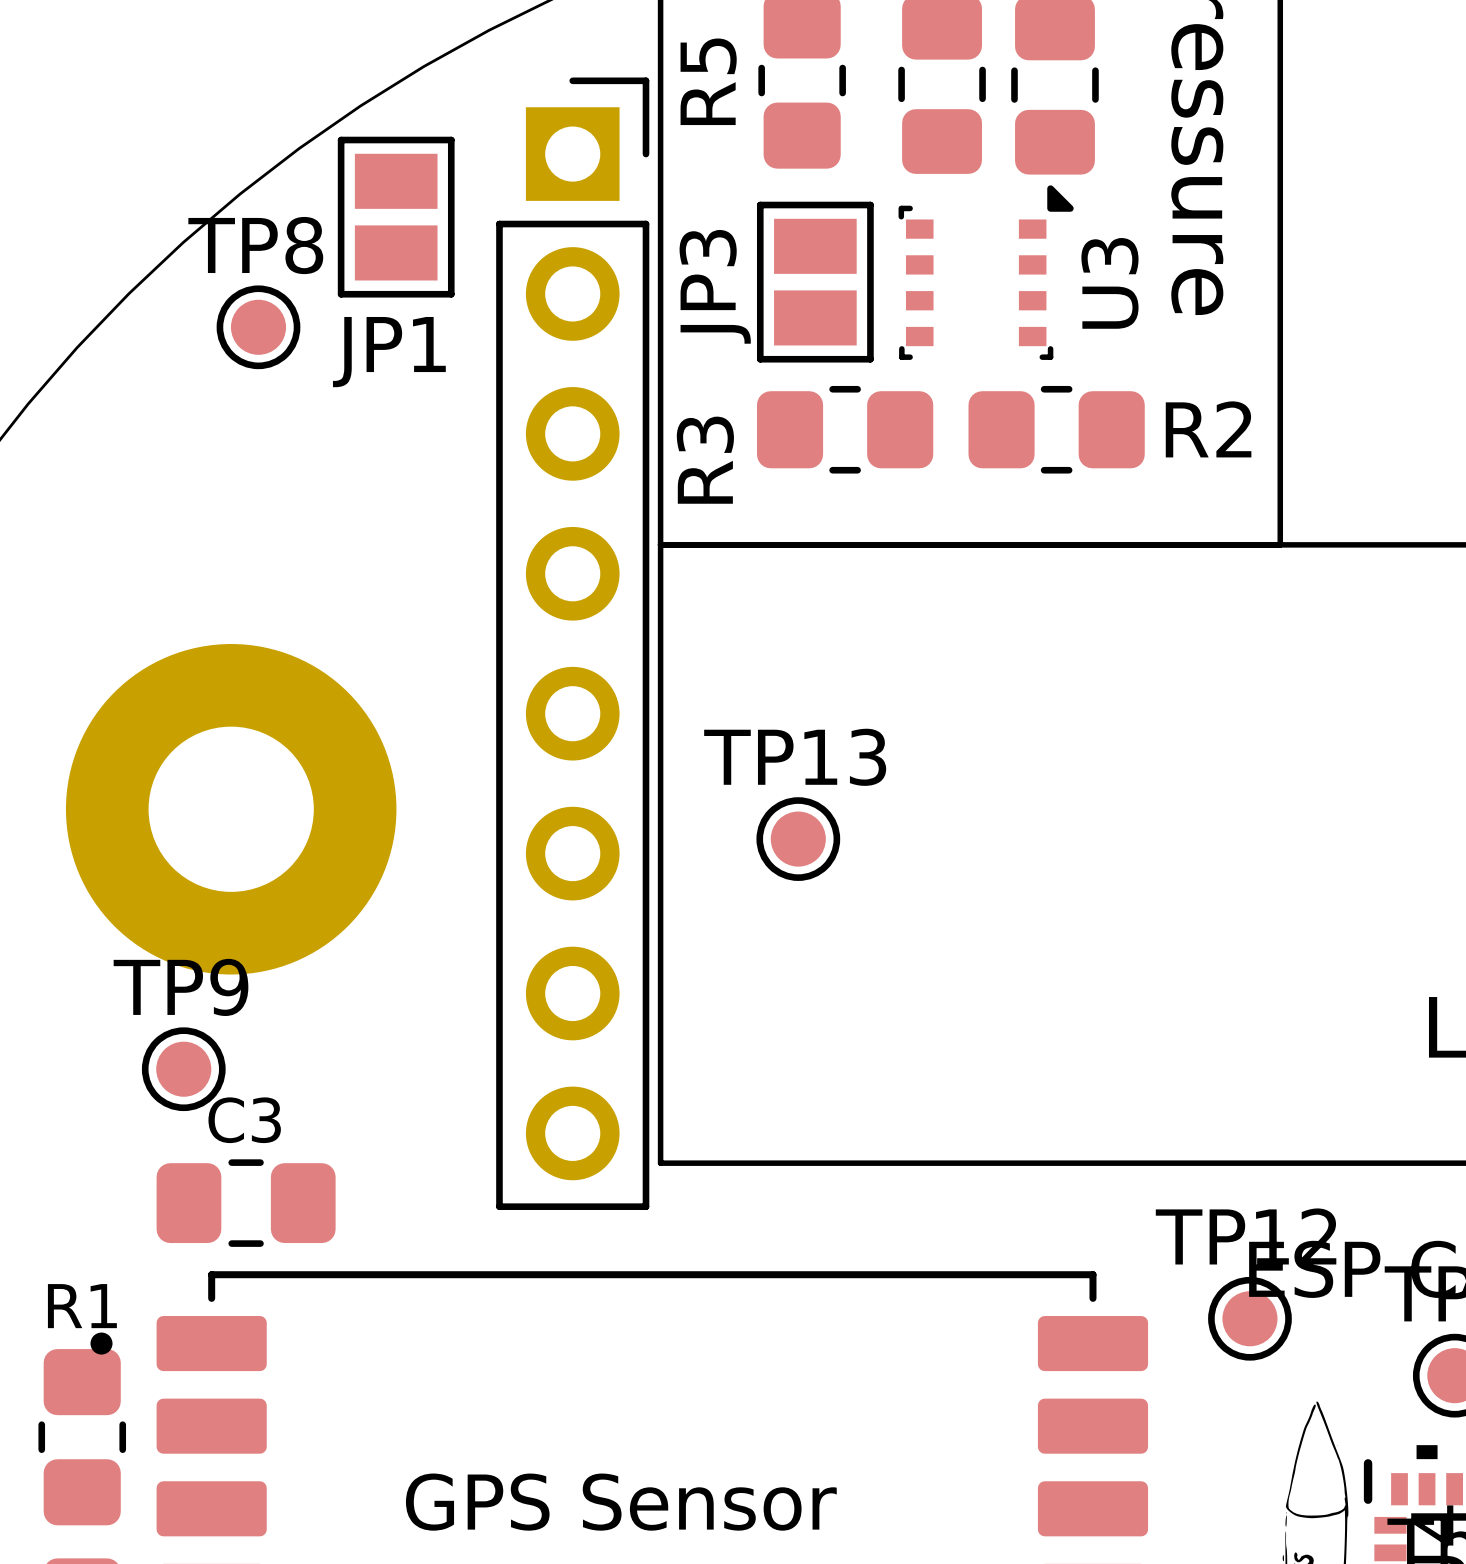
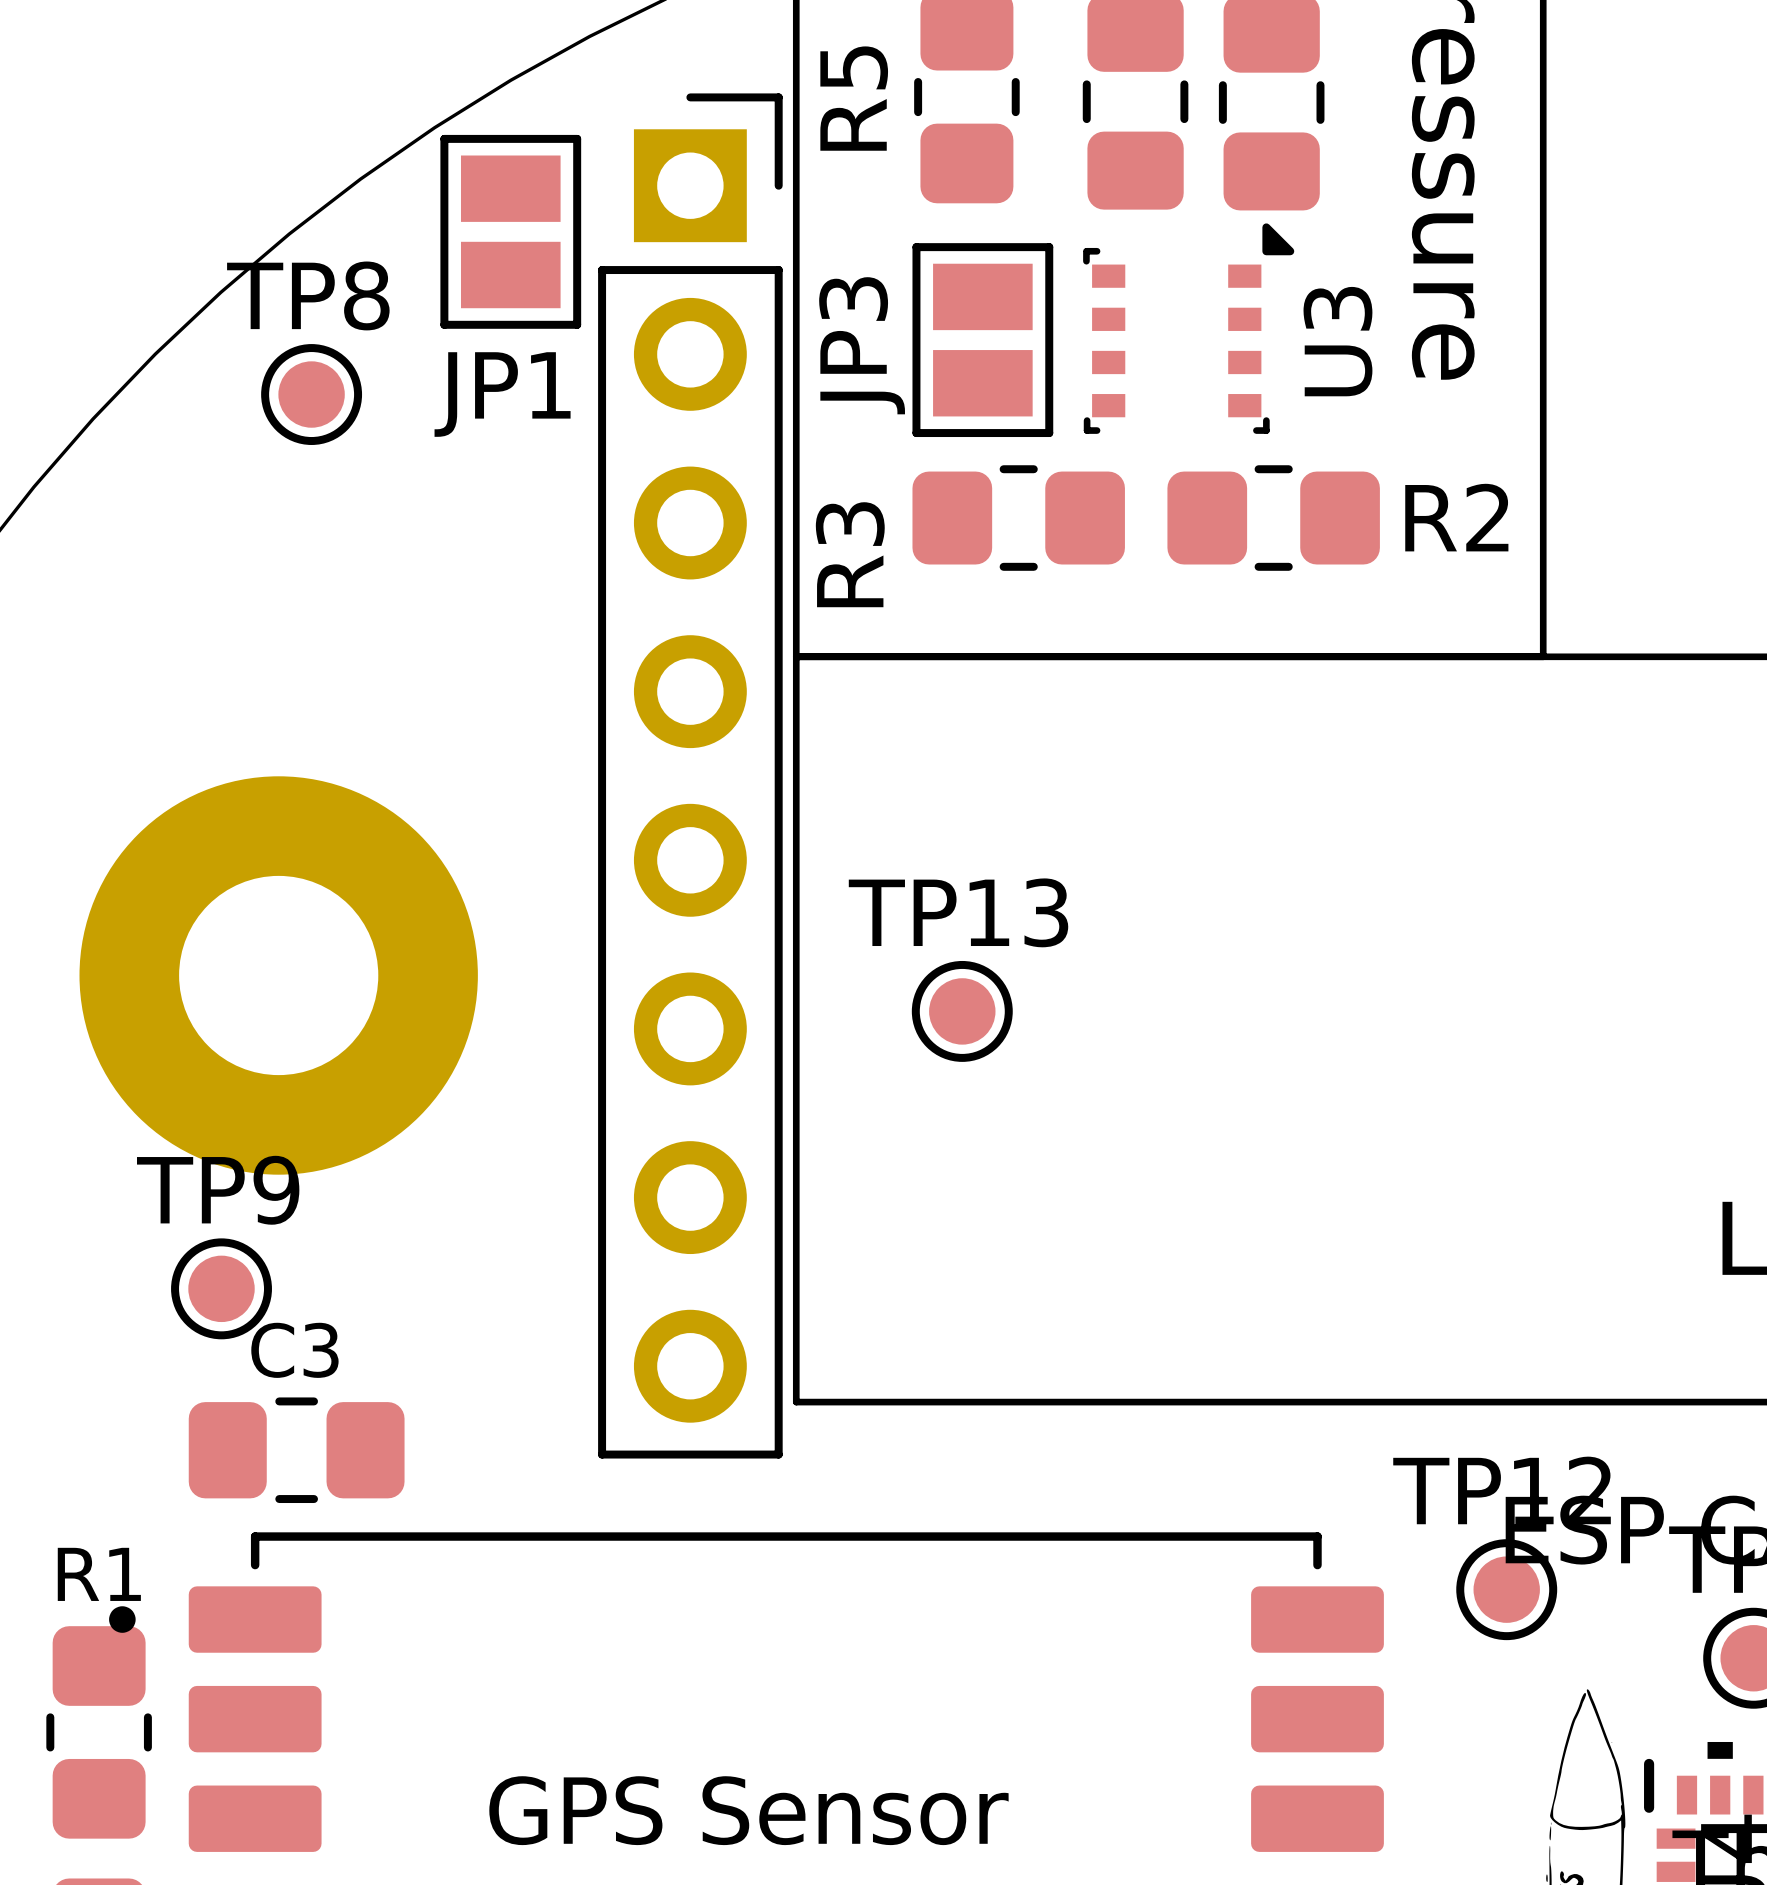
JP1 position: (396, 217) -> (510, 231)

